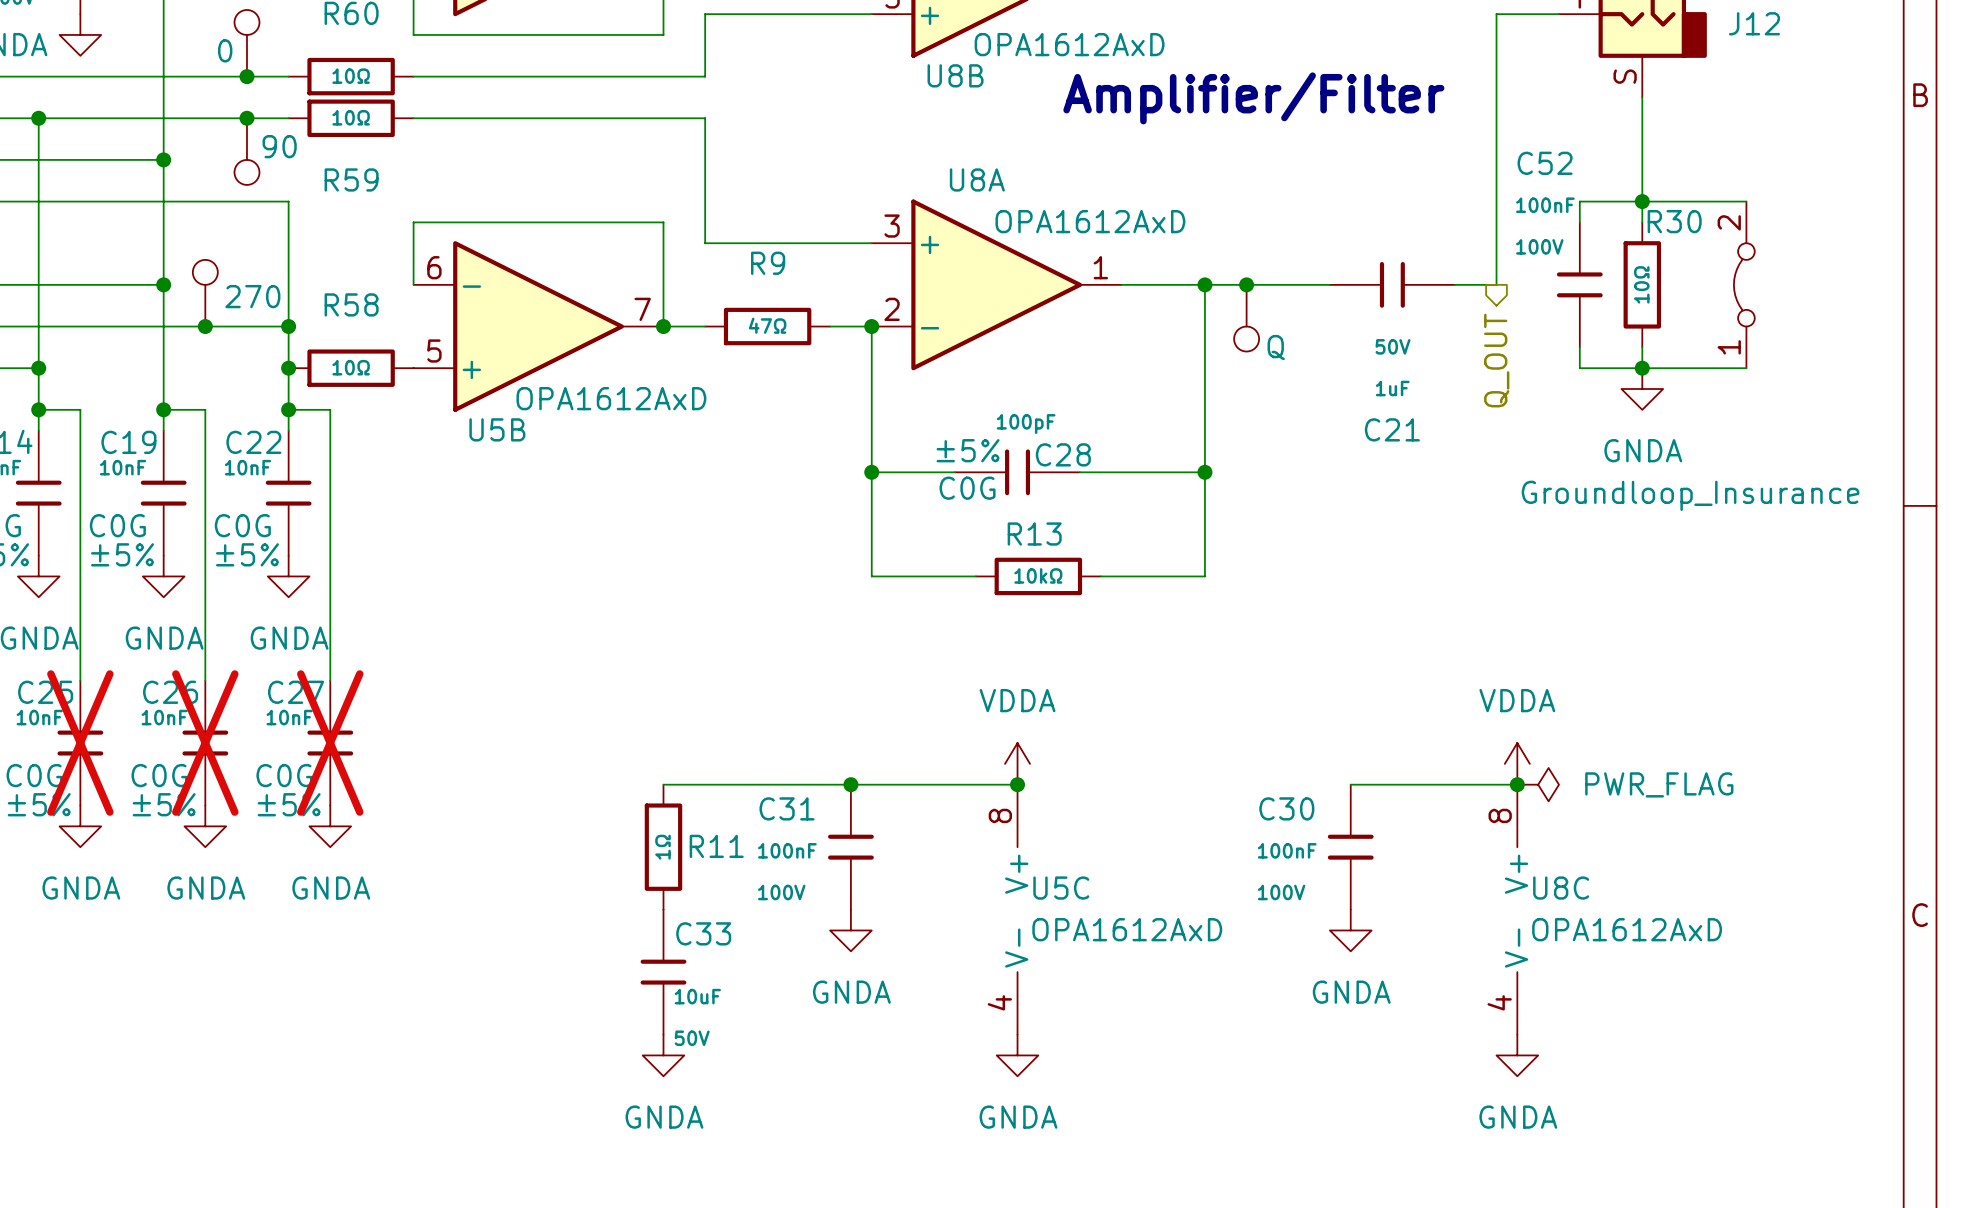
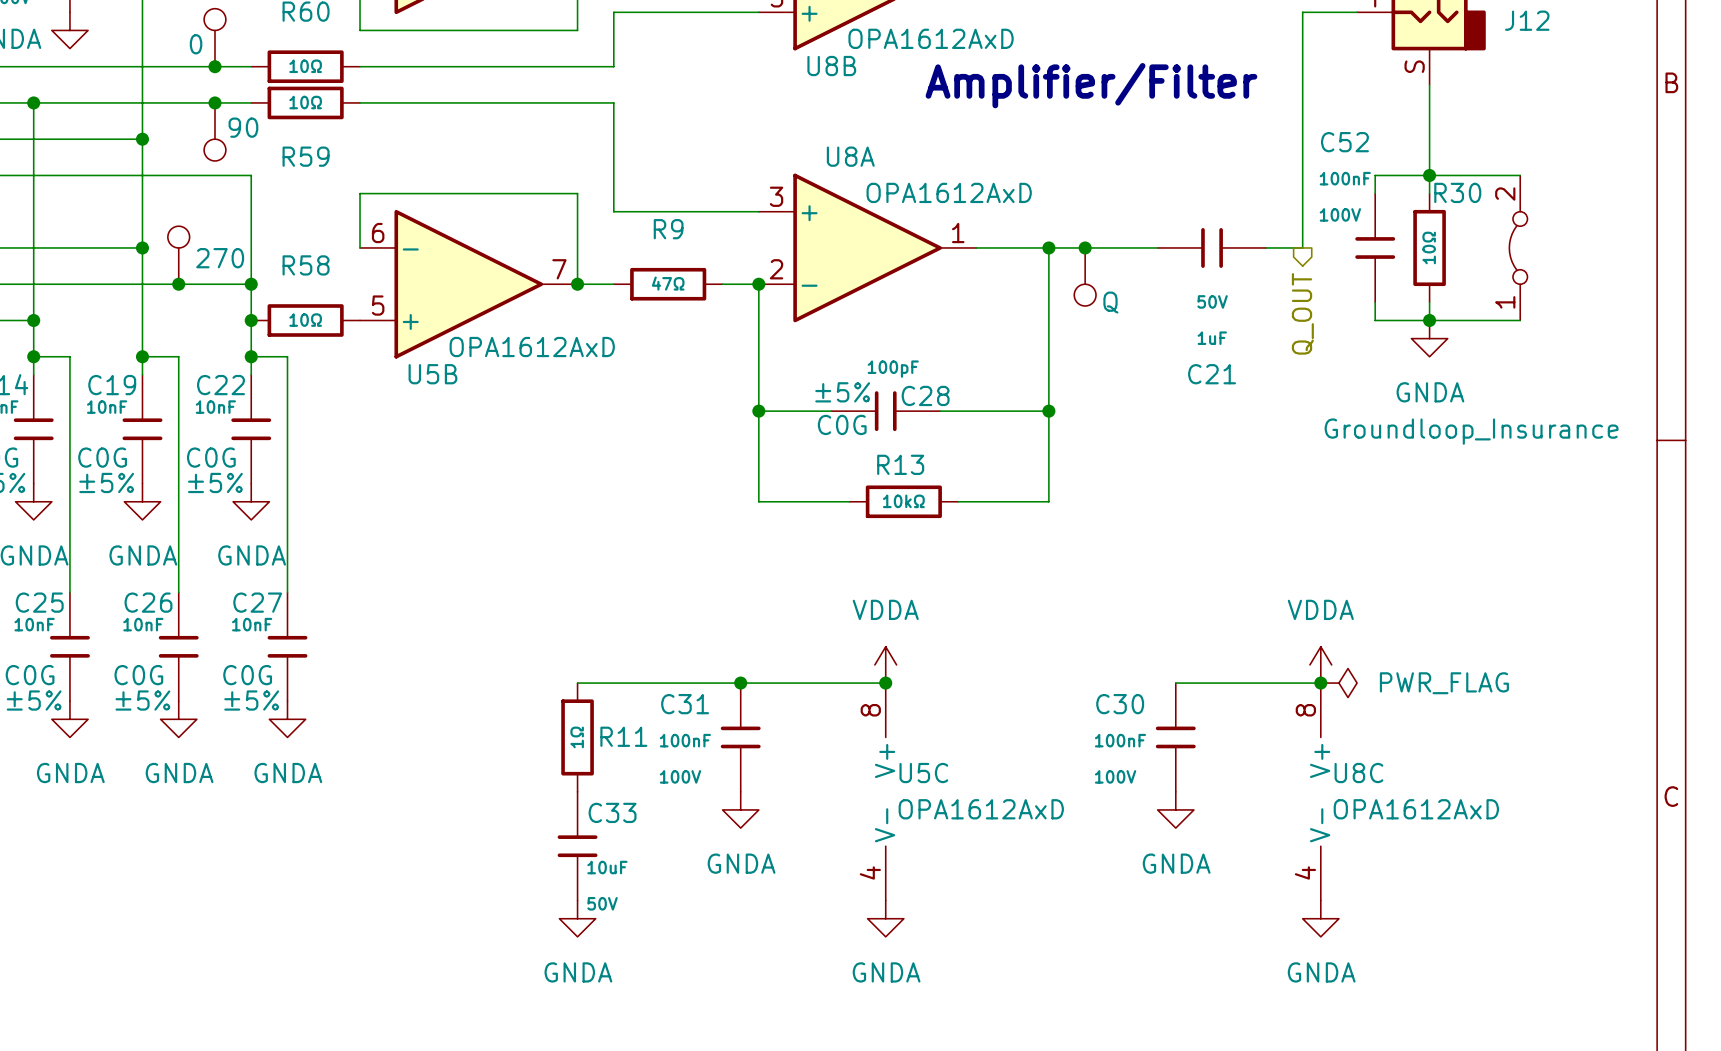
C25 do-not-place cross: (80, 743) -> none
C26 do-not-place cross: (205, 743) -> none
C27 do-not-place cross: (330, 743) -> none

